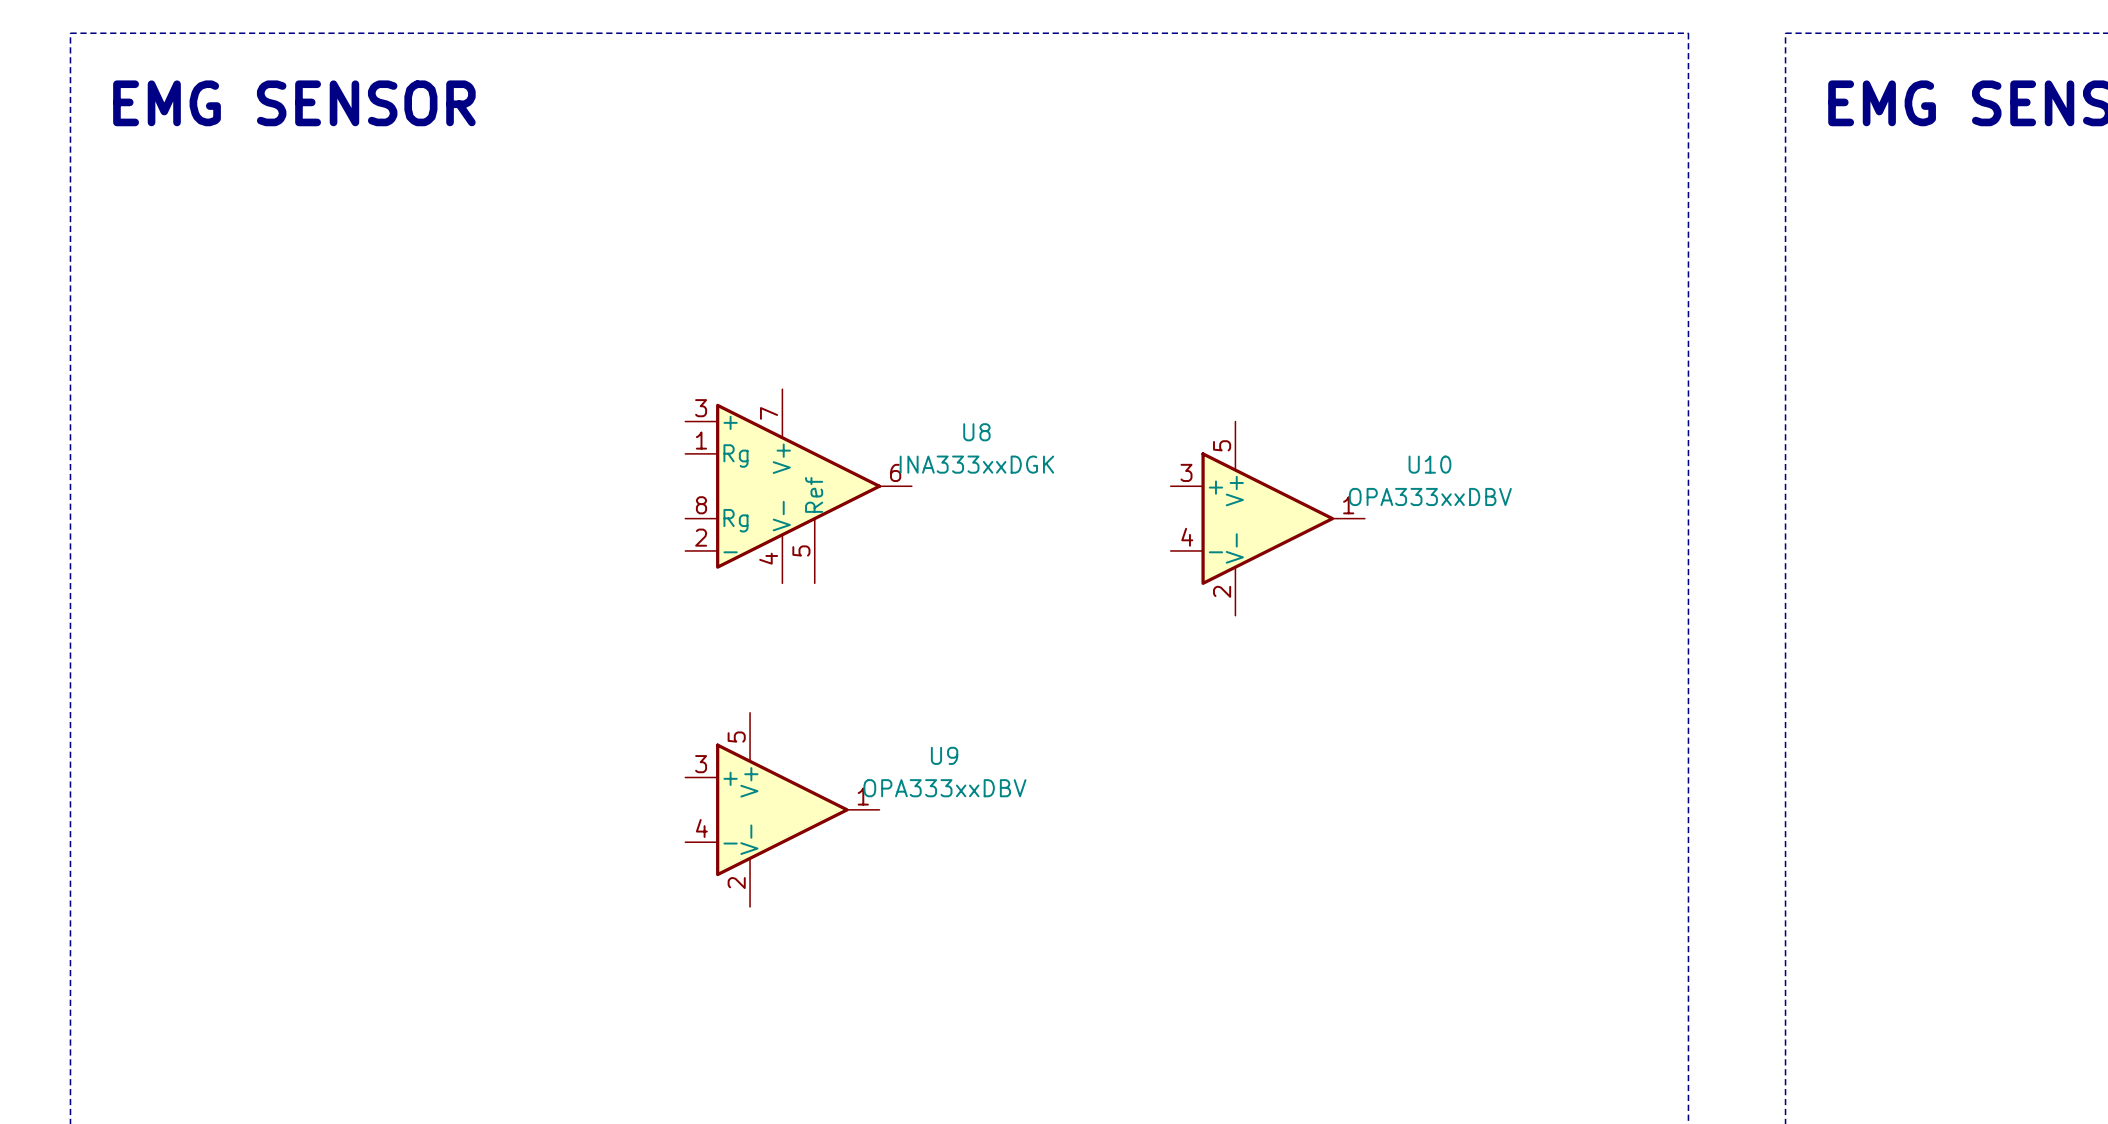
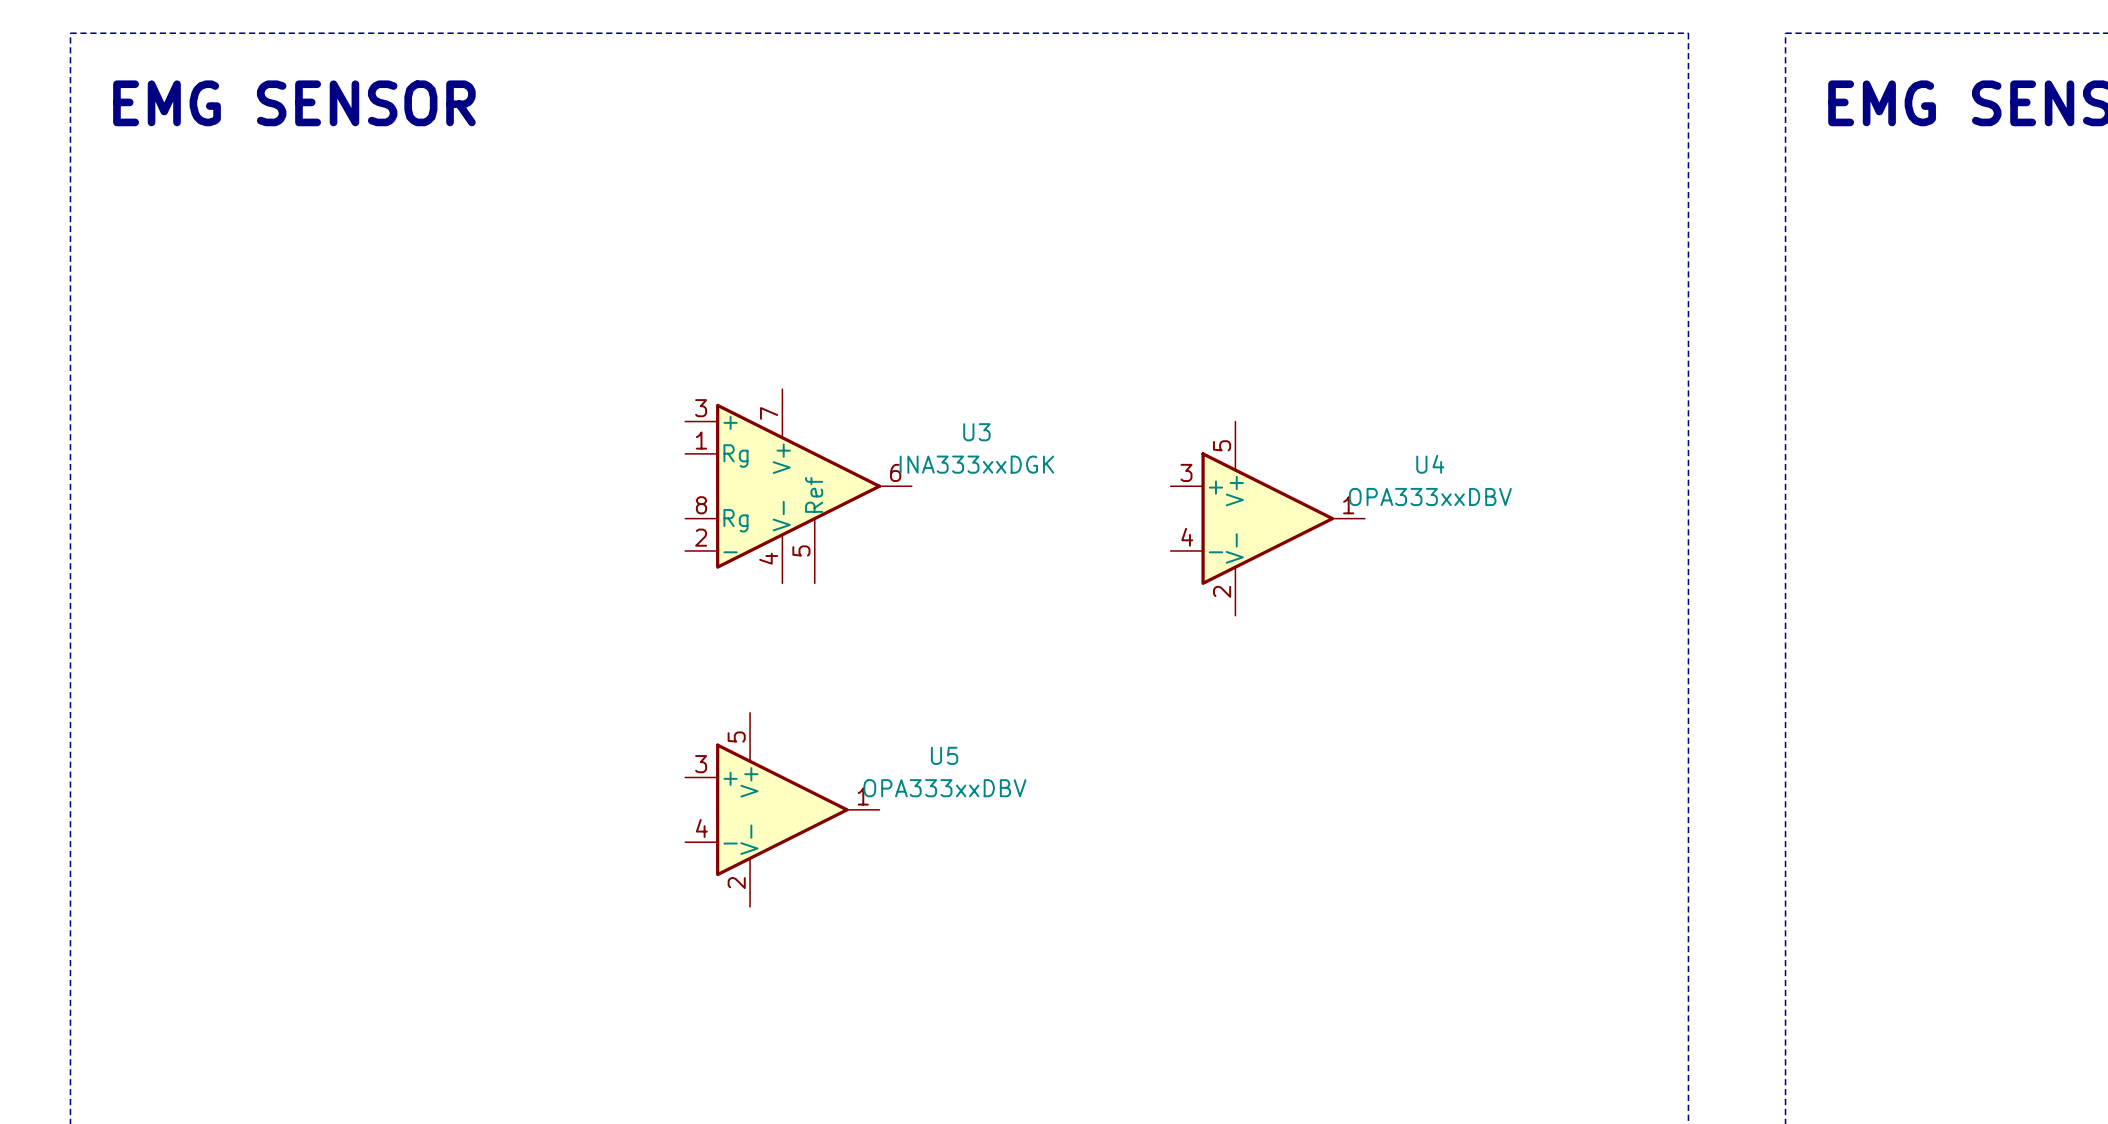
U8 name: U8 (976, 432) -> U3 (976, 432)
U10 name: U10 (1429, 464) -> U4 (1430, 464)
U9 name: U9 (944, 755) -> U5 (944, 755)

